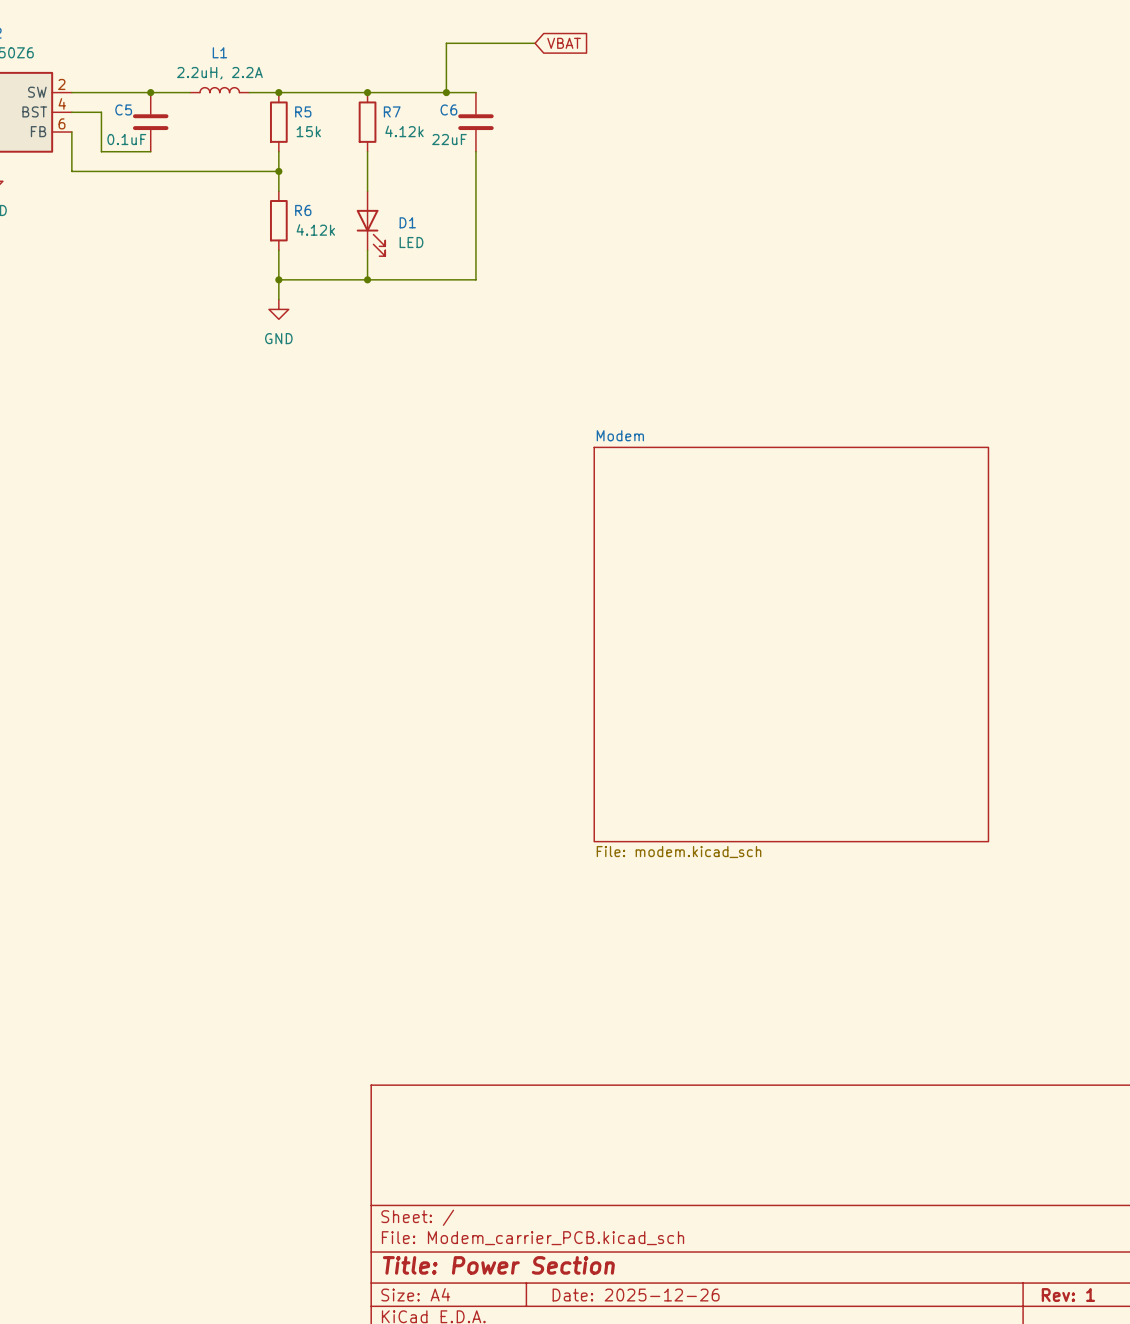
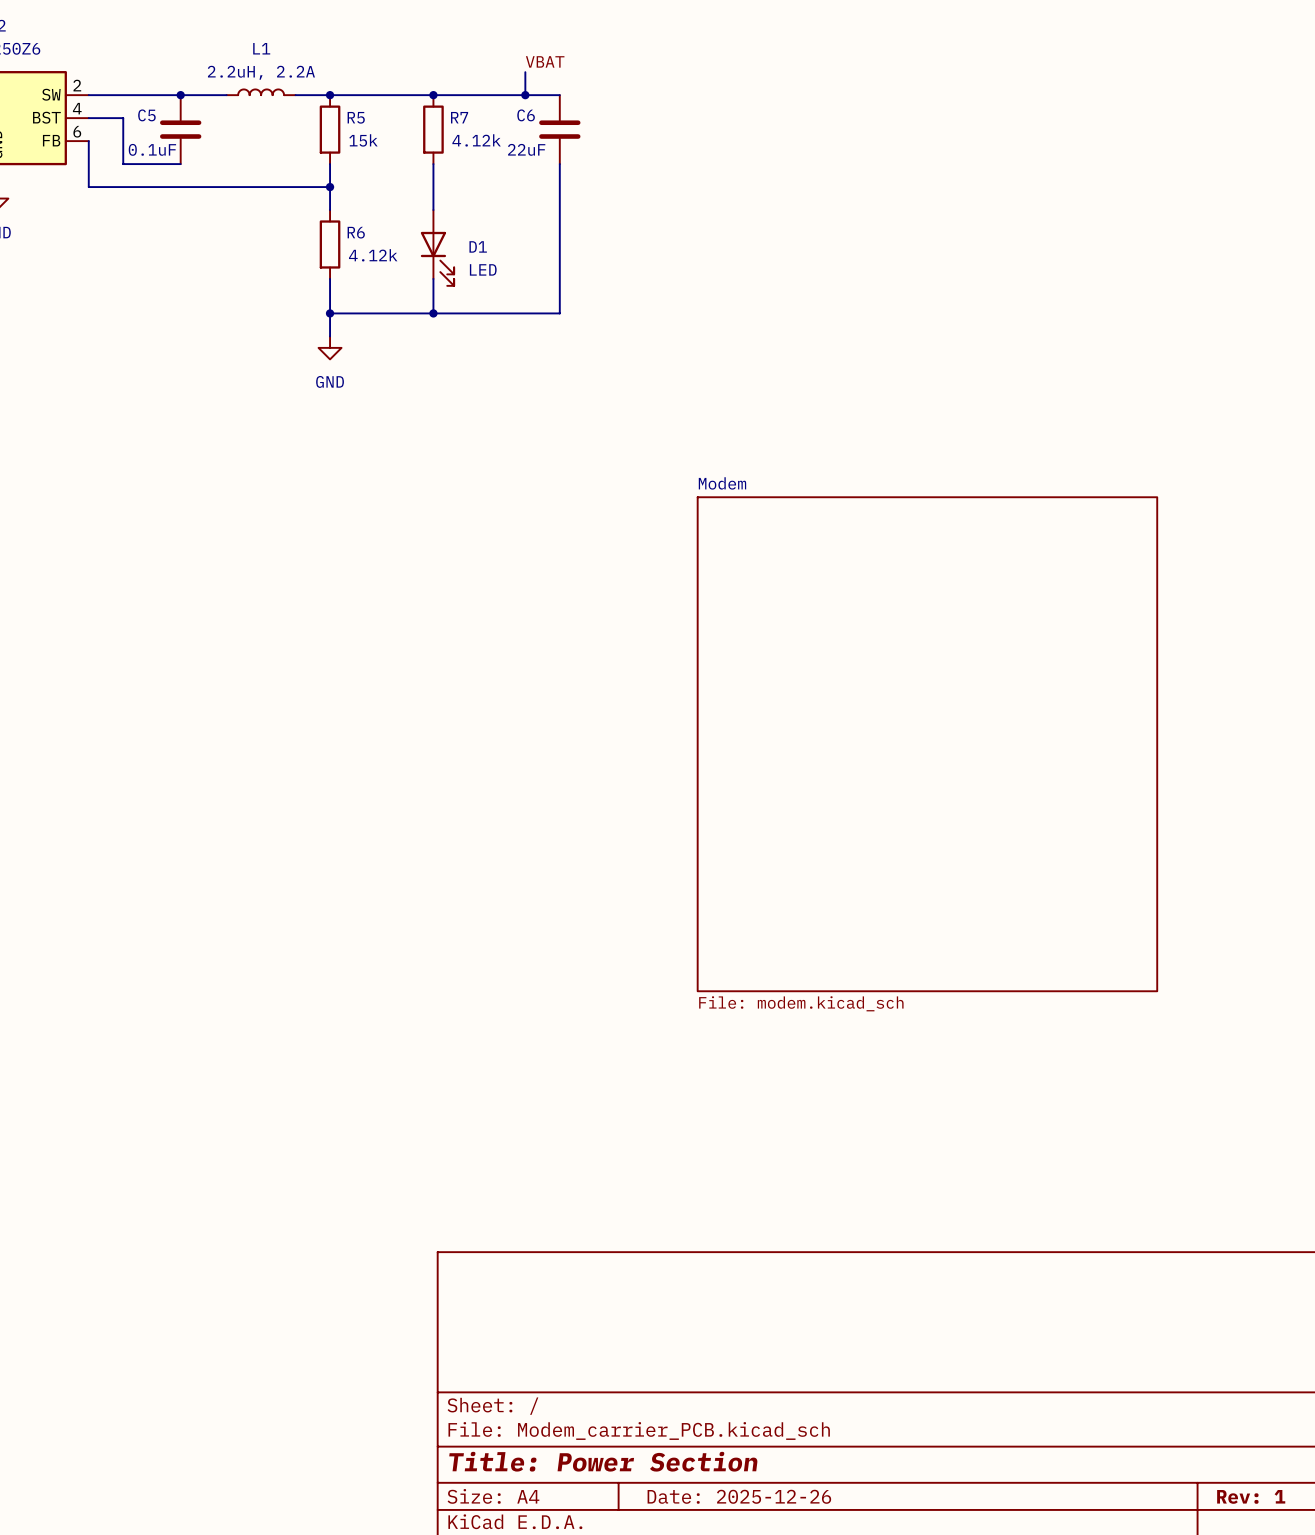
wire: (535, 43) (446, 43) (446, 72) -> none
global label: VBAT (564, 43) -> none
label: none -> VBAT (545, 61)
sheet Modem shape: [593, 446, 990, 843] -> [696, 496, 1158, 992]

